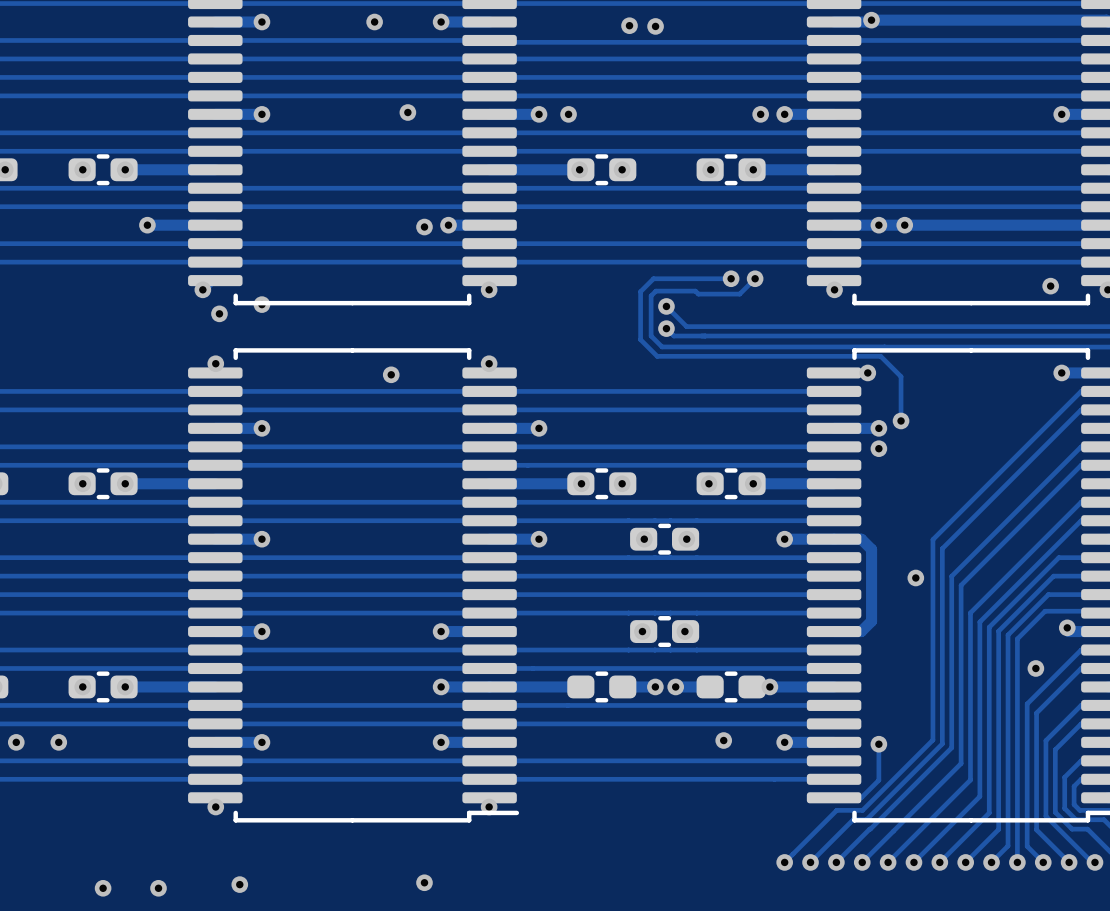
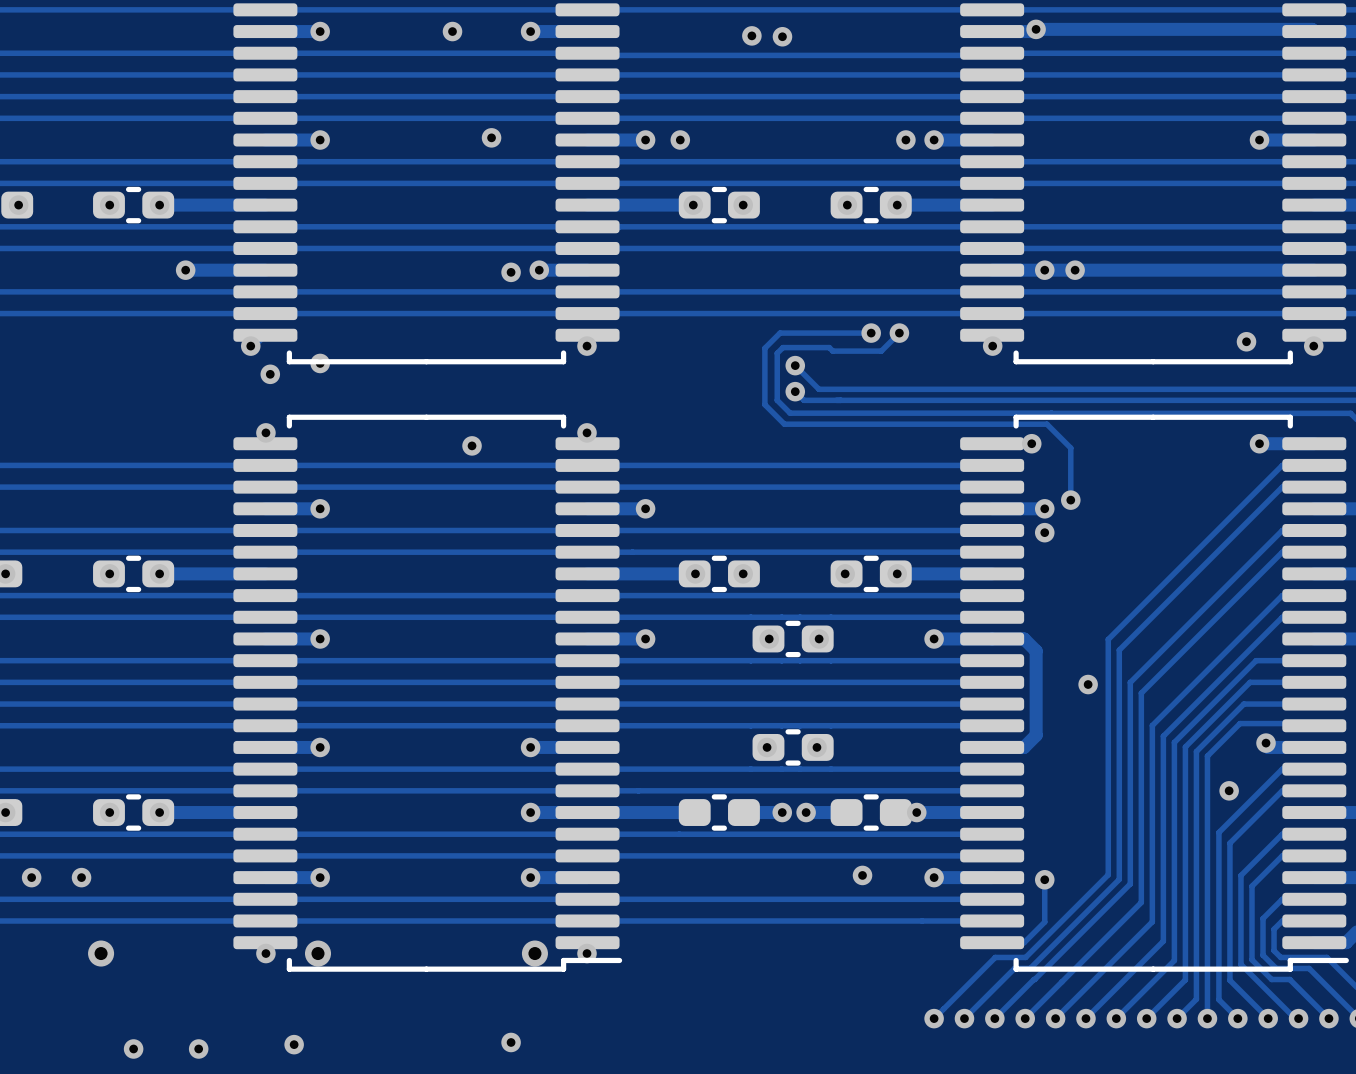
via: none -> (101, 953)
via: none -> (318, 953)
via: none -> (534, 953)

